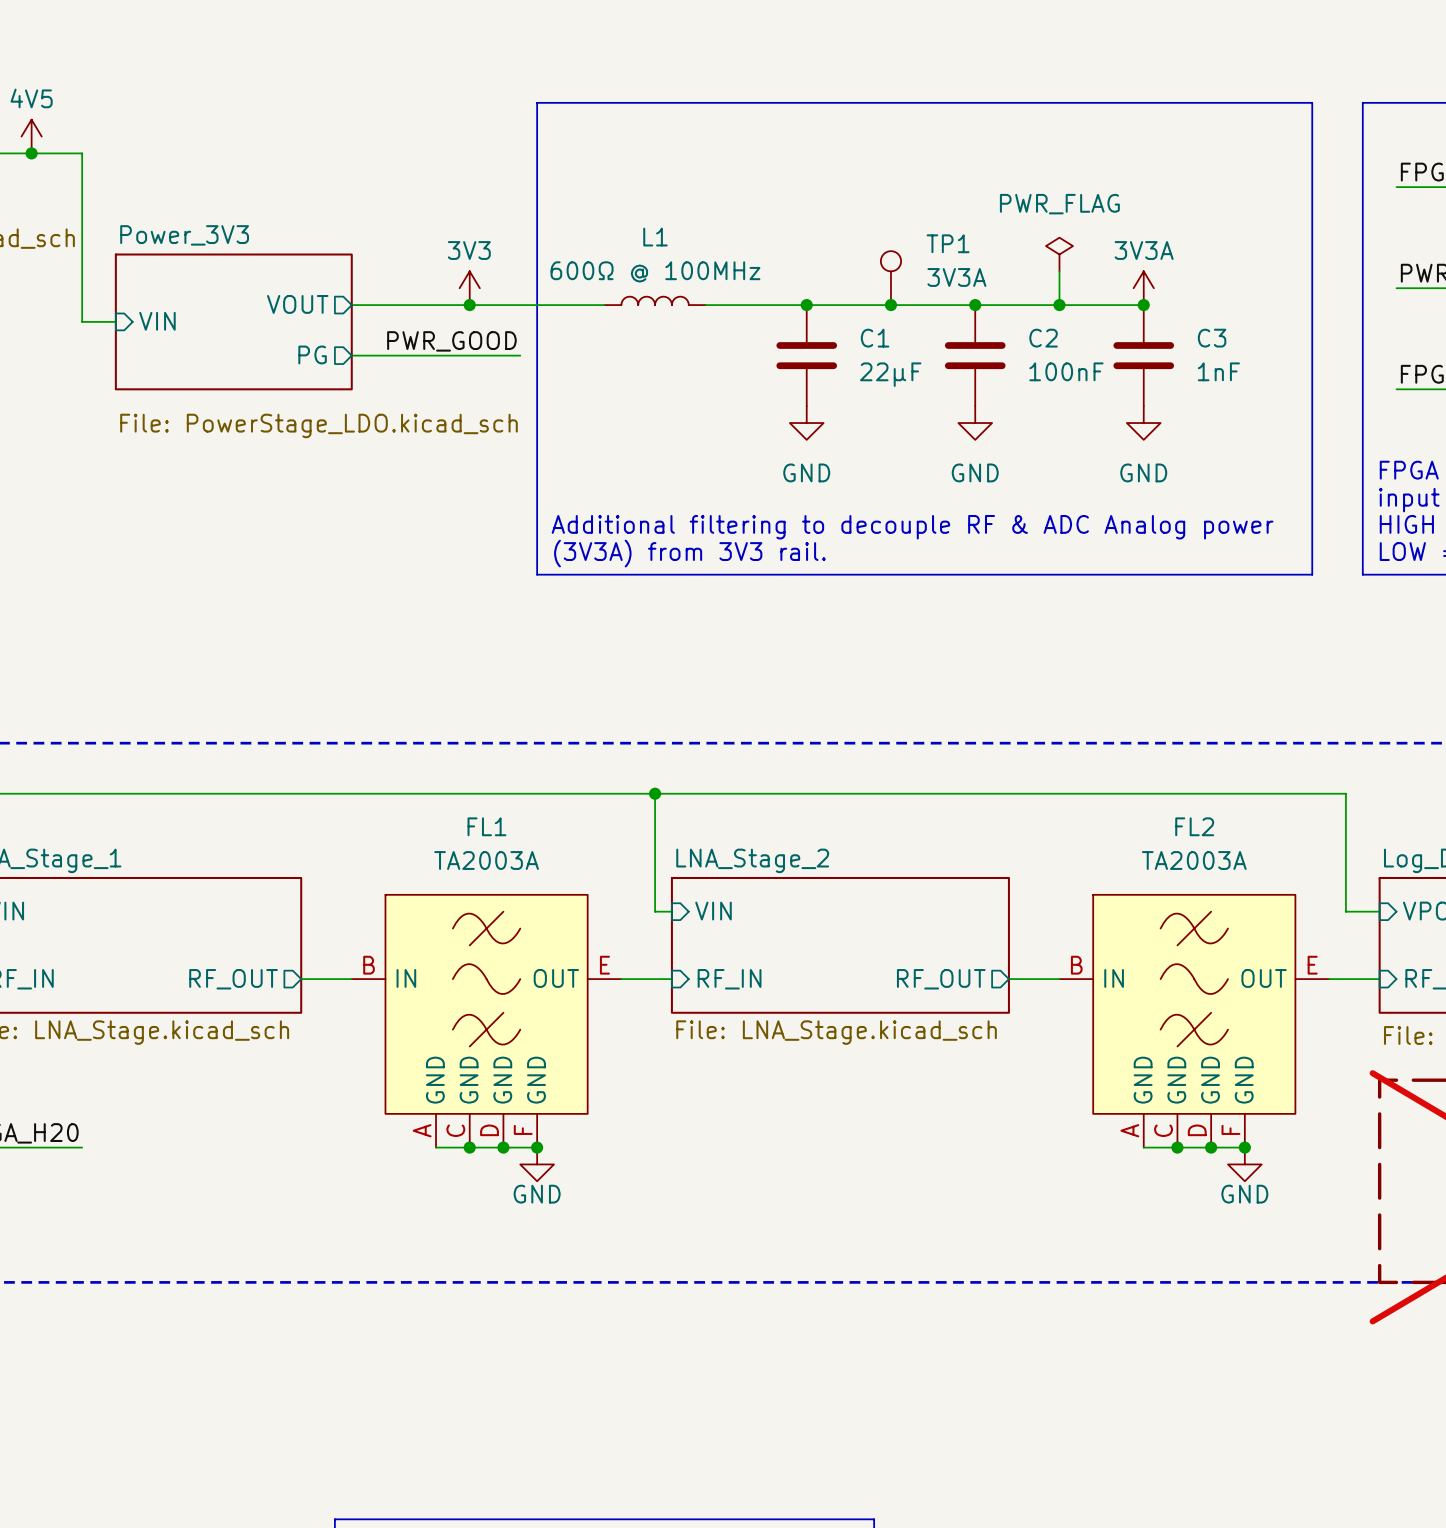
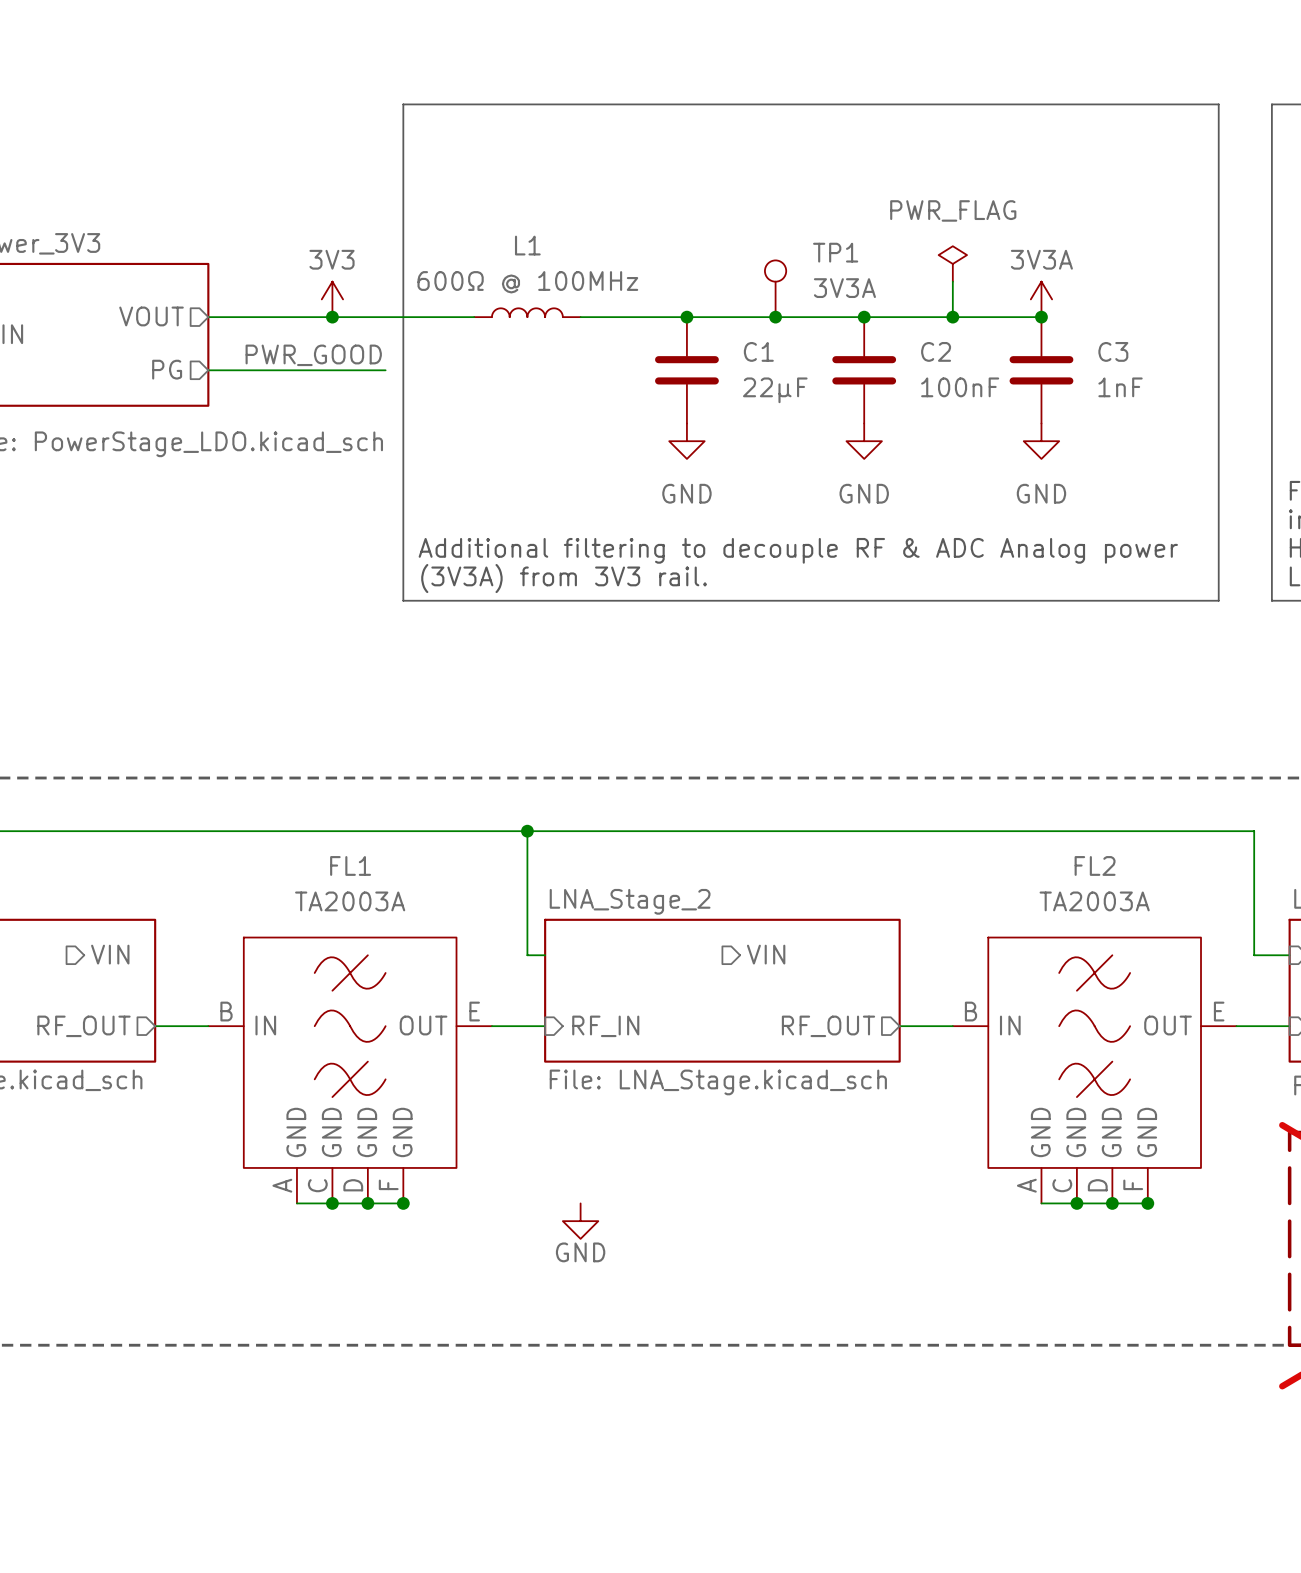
sheet pin: none -> VIN (110, 954)
sheet pin position: VIN (713, 911) -> VIN (766, 954)
power symbol position: GND (537, 1164) -> GND (580, 1221)
power symbol: GND (1244, 1164) -> none

